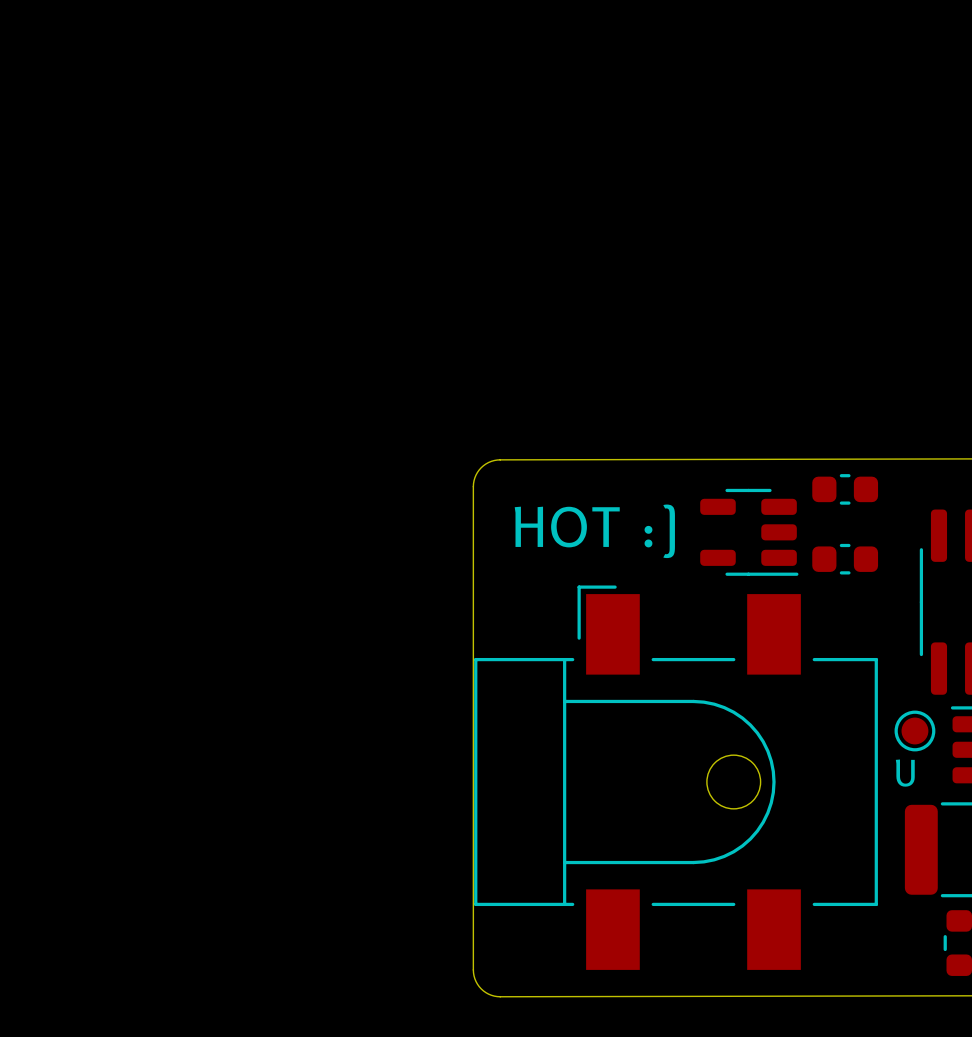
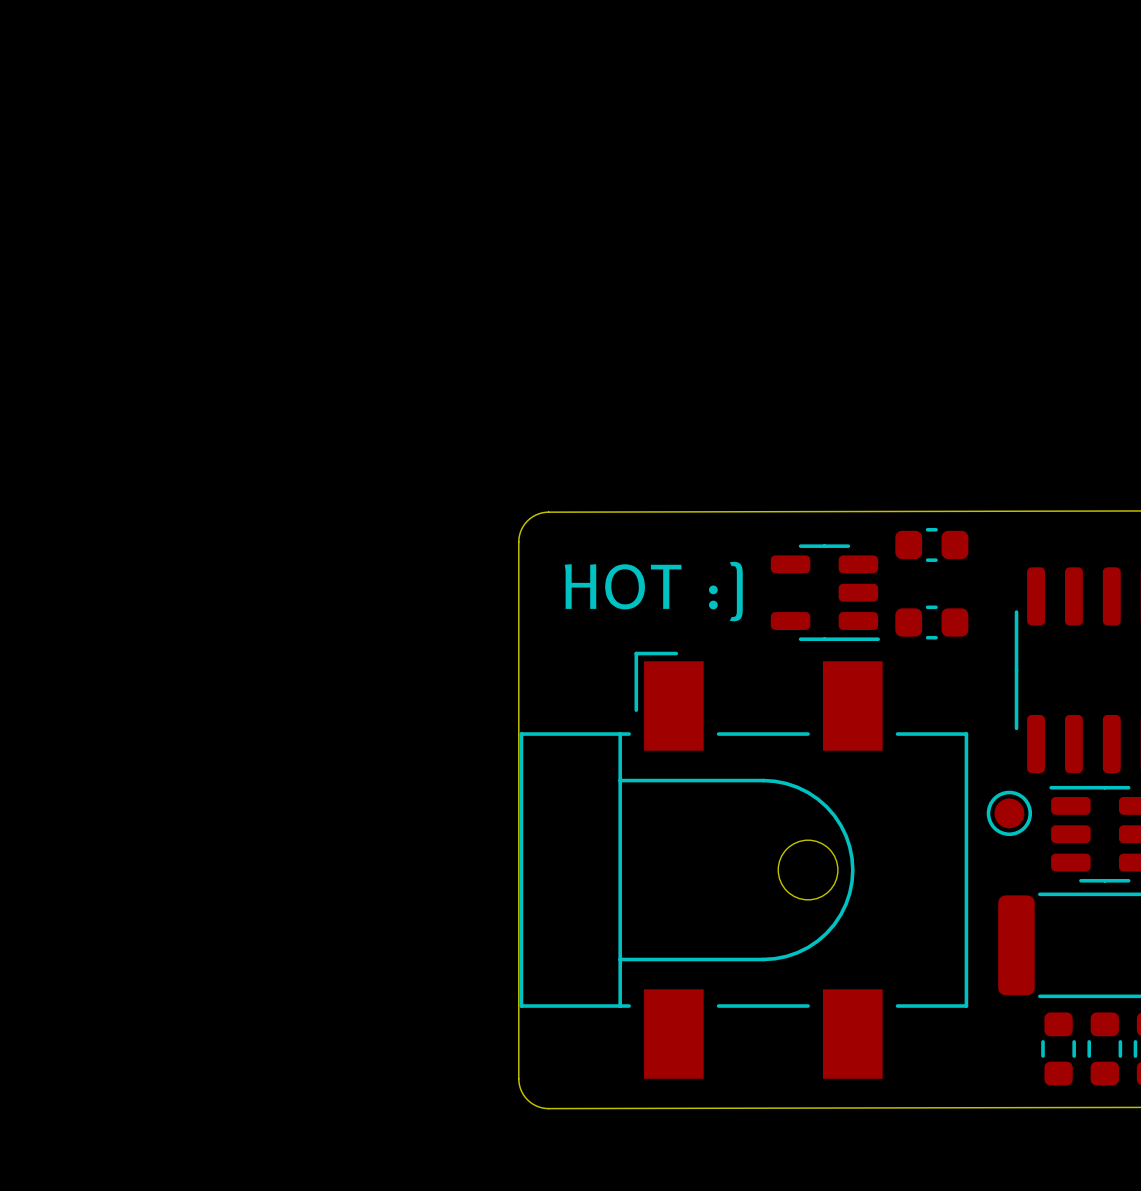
text: U (905, 773) -> none

